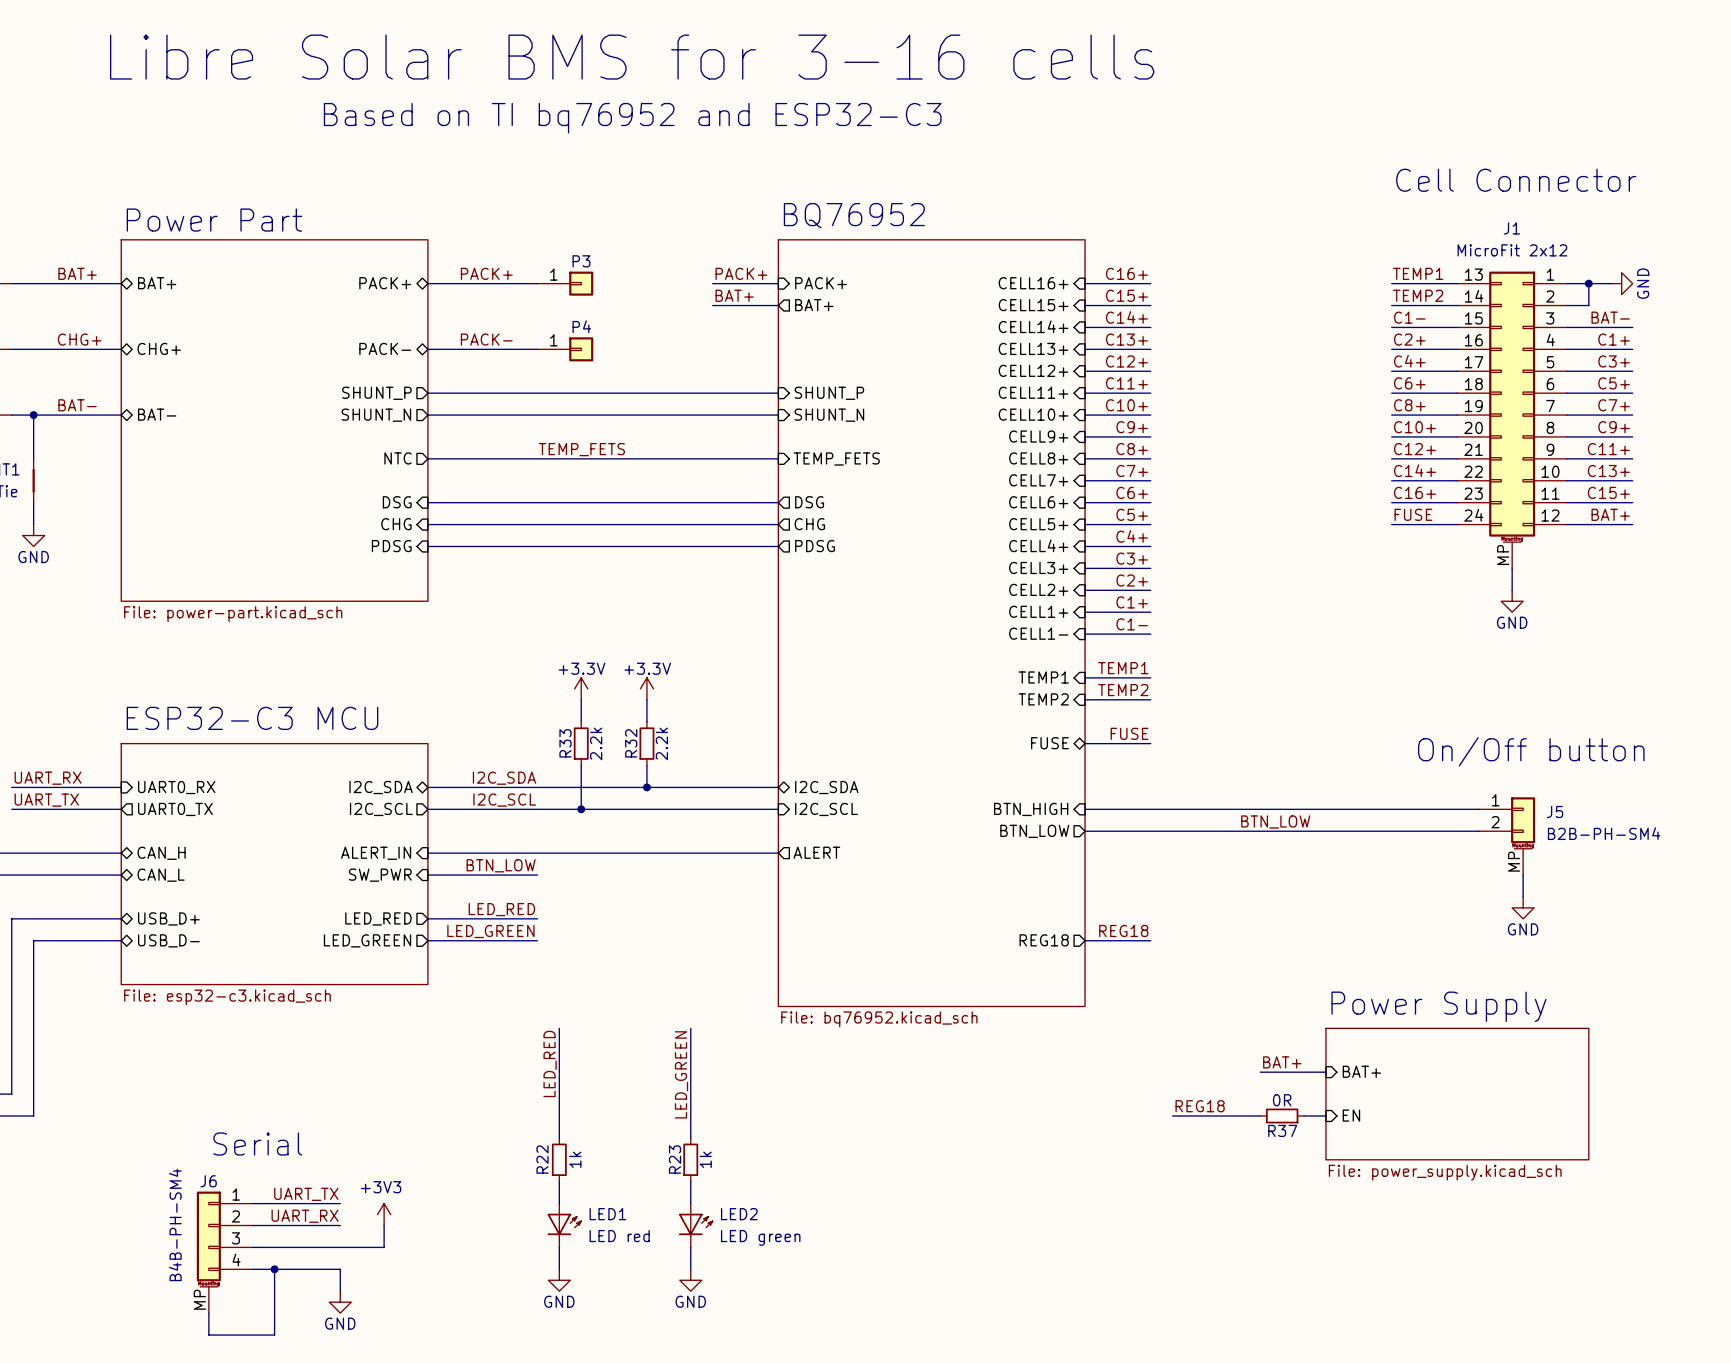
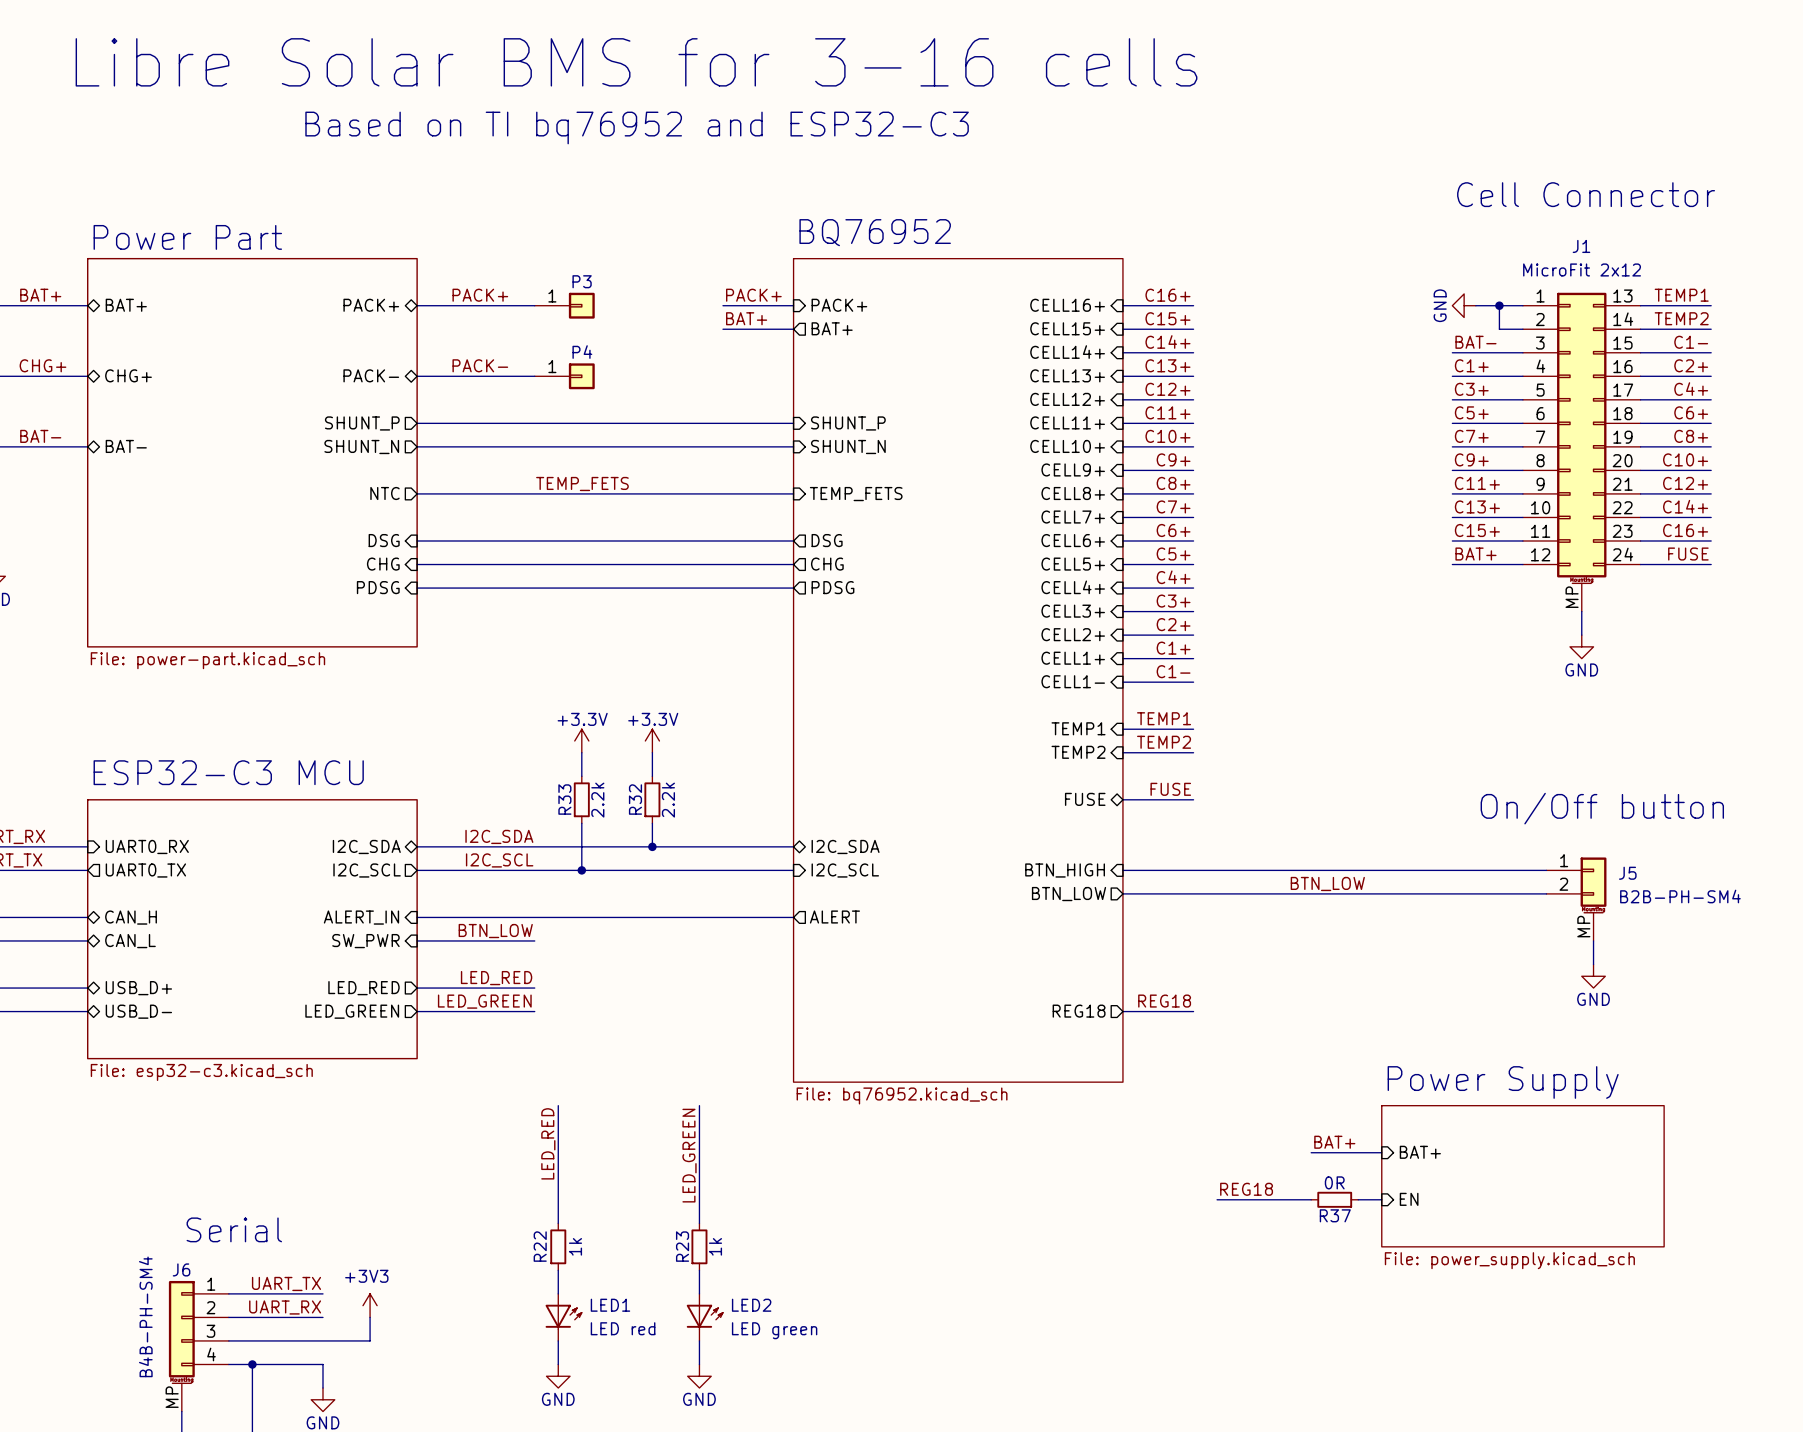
label: TEMP1 (1418, 273) -> none
label: none -> TEMP1 (1681, 295)
power symbol: none -> GND (1464, 305)
junction: none -> (1499, 305)
wire: (1588, 283) (1588, 305) -> (1711, 329) (1664, 329)
junction: (1588, 283) -> none
power symbol: GND (1621, 283) -> none
label: TEMP2 (1418, 295) -> none
label: none -> TEMP2 (1681, 318)
wire: (1391, 305) (1435, 305) -> (1499, 305) (1499, 329)
label: C1- (1409, 317) -> BAT- (1475, 342)
label: BAT- (1610, 317) -> C1- (1691, 342)
label: C2+ (1409, 339) -> C1+ (1471, 365)
label: C1+ (1614, 339) -> C2+ (1691, 365)
label: C4+ (1409, 361) -> C3+ (1471, 389)
label: C3+ (1614, 361) -> C4+ (1691, 389)
label: C6+ (1409, 383) -> C5+ (1471, 412)
label: C5+ (1614, 383) -> C6+ (1691, 412)
label: C8+ (1409, 405) -> C7+ (1471, 436)
label: C7+ (1614, 405) -> C8+ (1691, 436)
J1 flip: as is (1512, 407) -> left-right (1581, 438)
label: C10+ (1414, 427) -> C9+ (1471, 459)
label: C9+ (1614, 427) -> C10+ (1685, 459)
label: C12+ (1414, 449) -> C11+ (1477, 483)
label: C11+ (1608, 449) -> C12+ (1685, 483)
label: C14+ (1414, 470) -> C13+ (1477, 506)
label: C13+ (1608, 470) -> C14+ (1685, 506)
label: C16+ (1414, 492) -> C15+ (1477, 530)
label: C15+ (1608, 492) -> C16+ (1685, 530)
label: FUSE (1413, 514) -> BAT+ (1475, 554)
label: BAT+ (1610, 514) -> FUSE (1688, 554)

